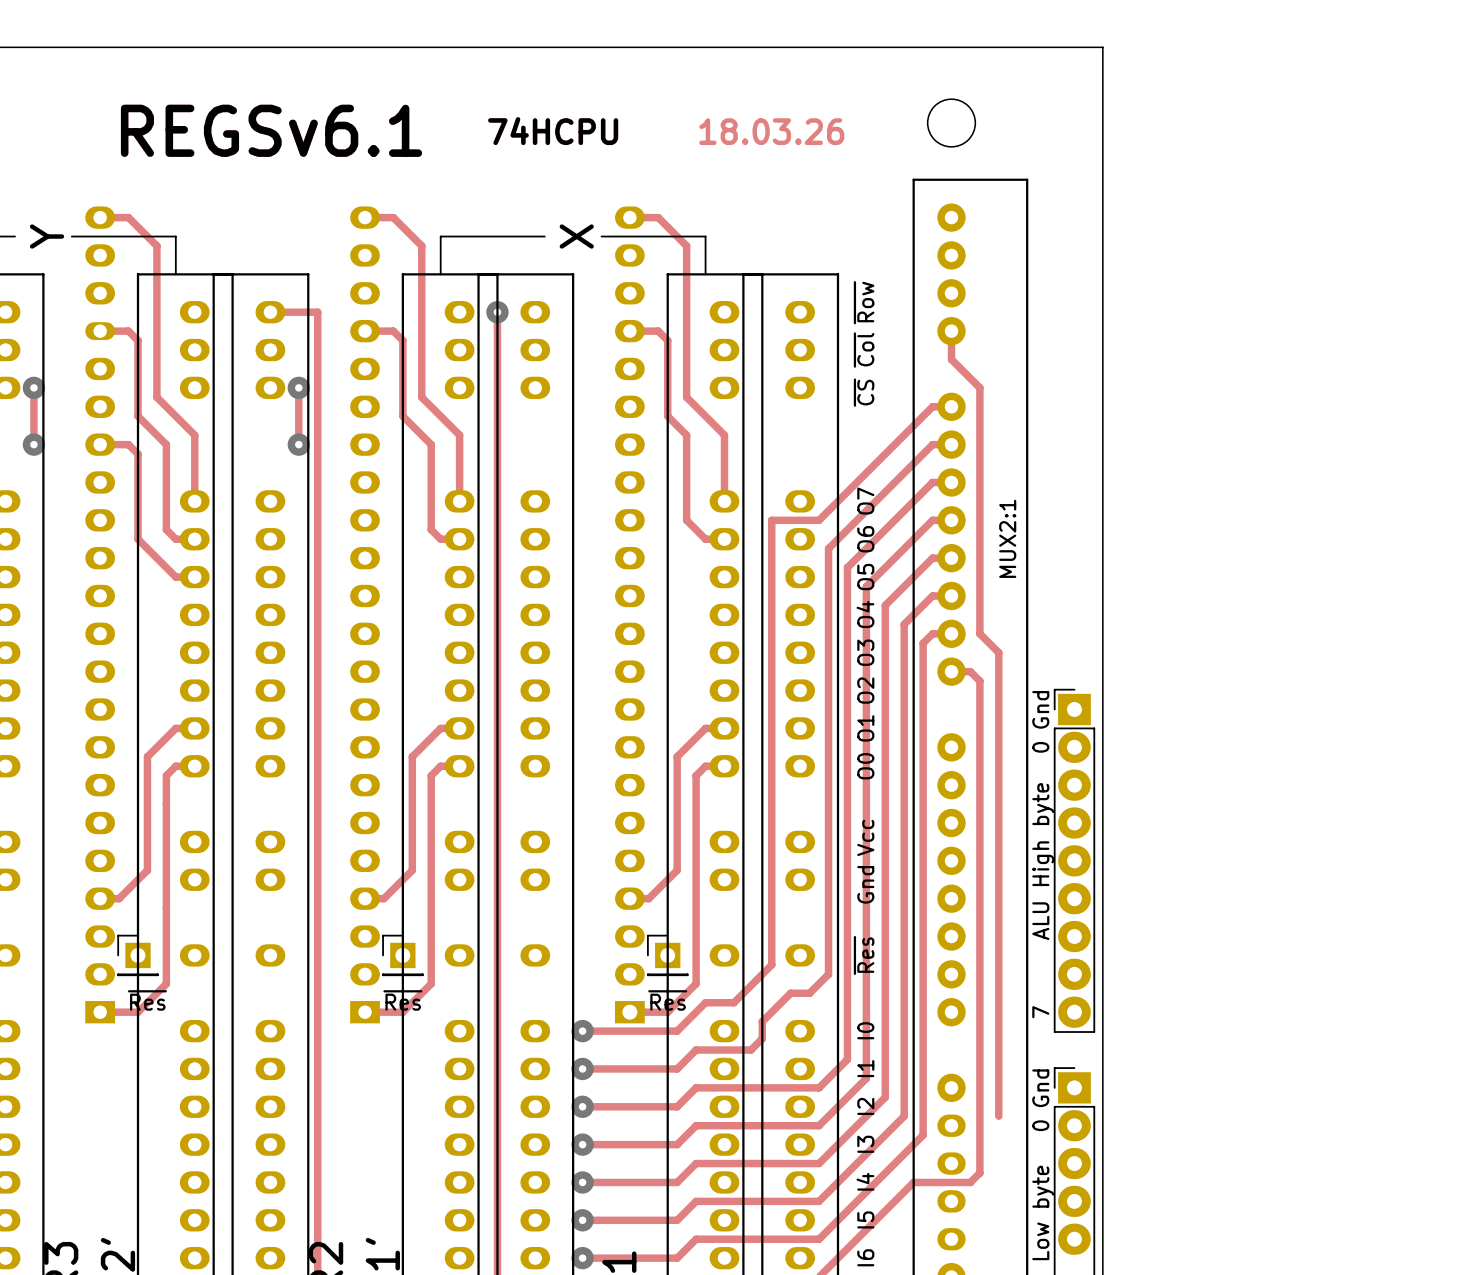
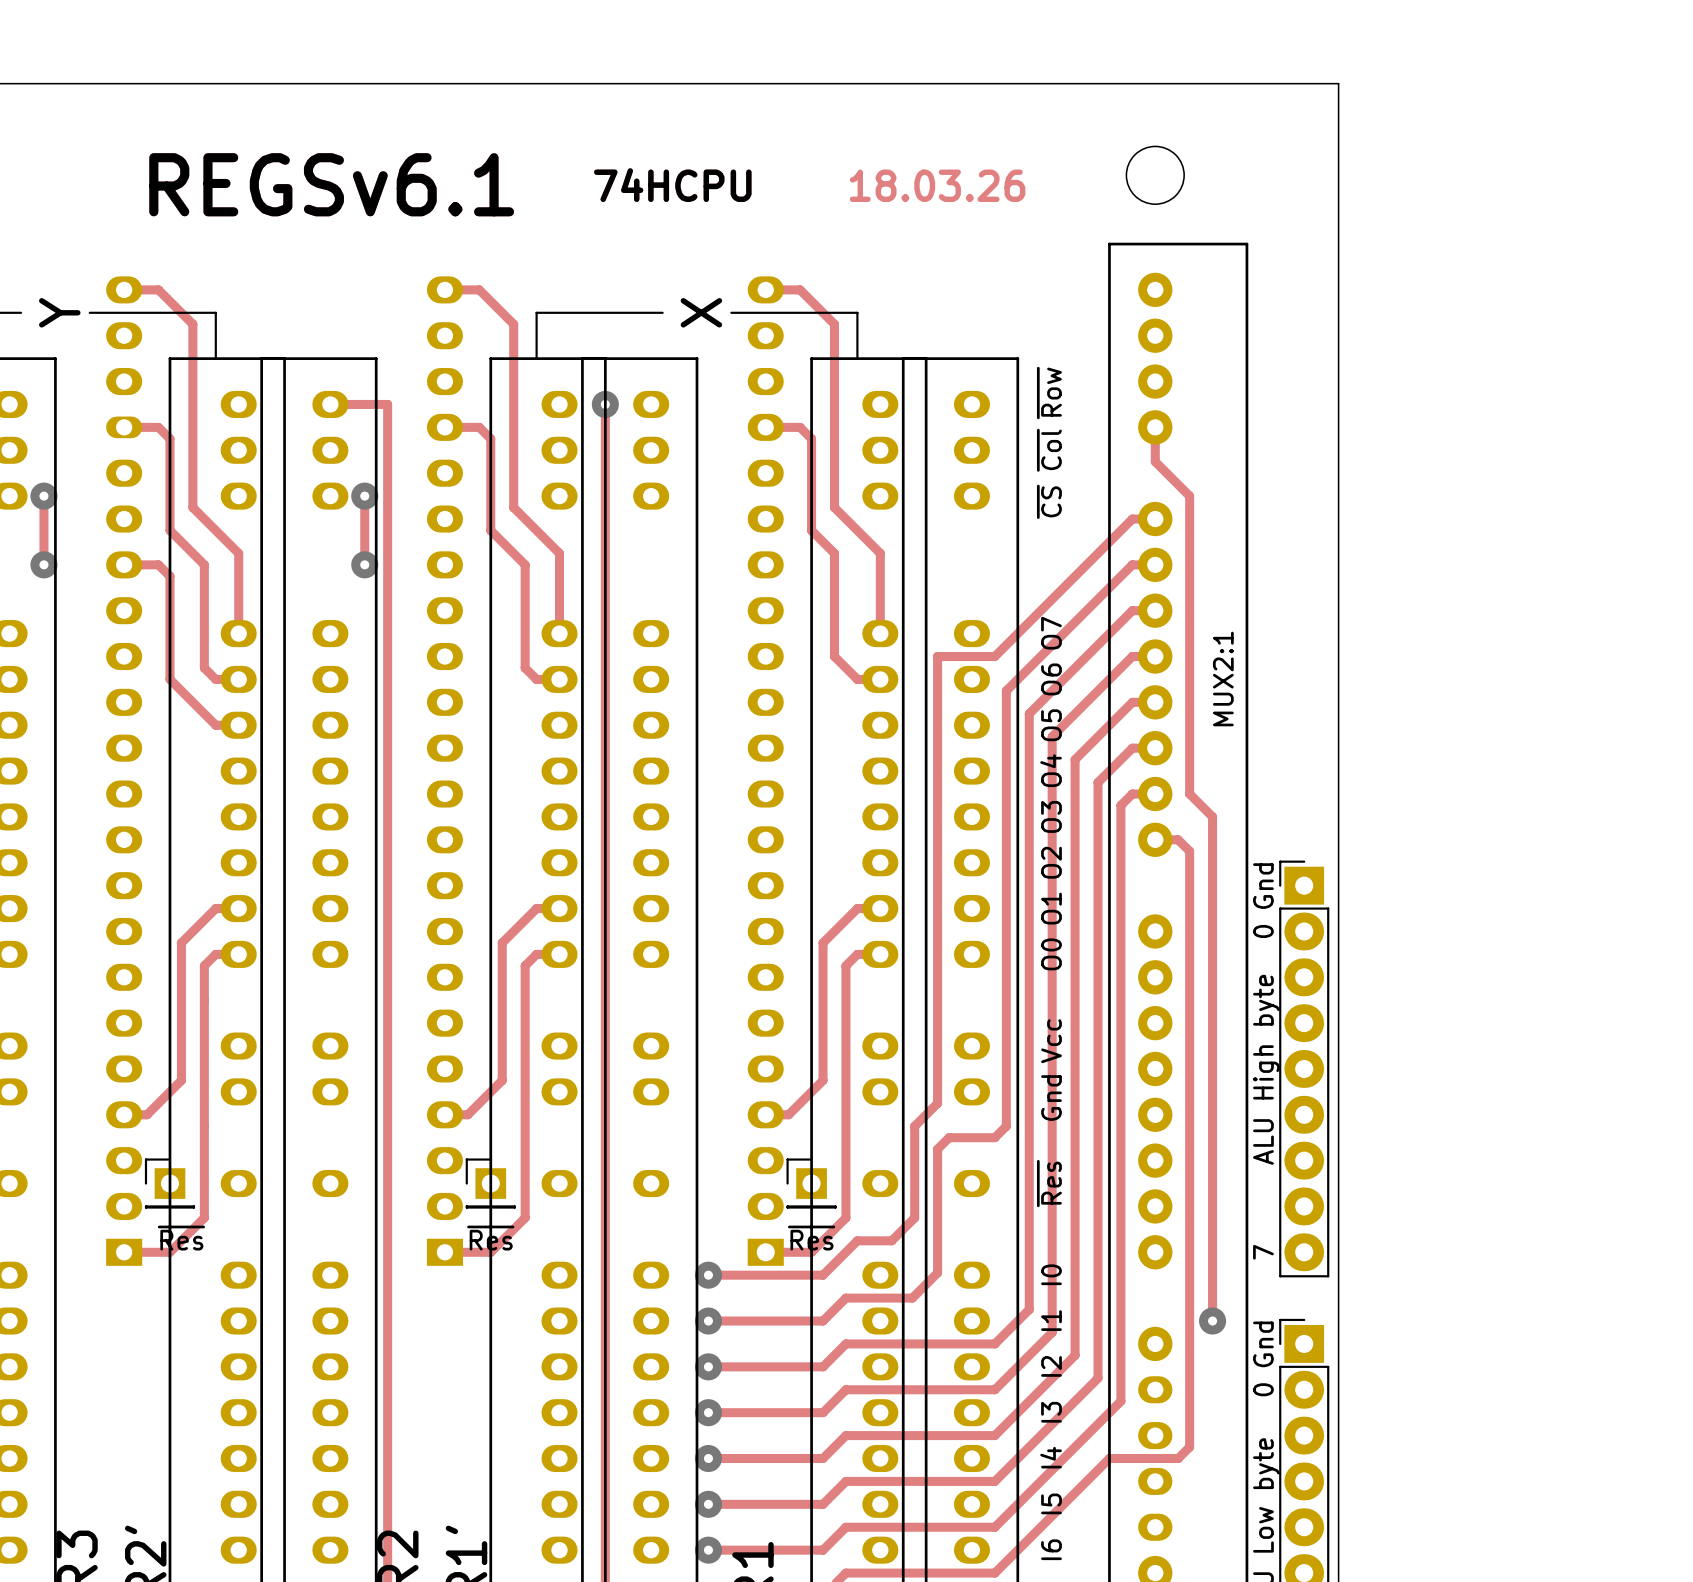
track: (771, 889) (771, 927) -> (1006, 1126) (994, 1137) (949, 1137) (937, 1149)
track: none -> (937, 1103) (914, 1126) (914, 1217)
track: (828, 908) (828, 974) (809, 993) (790, 993) (762, 1021) (762, 1038) -> none
track: (771, 964) (752, 983) -> (937, 1194) (937, 1272) (926, 1284)
track: (998, 1068) (998, 1116) -> none
via: none -> (1212, 1321)

